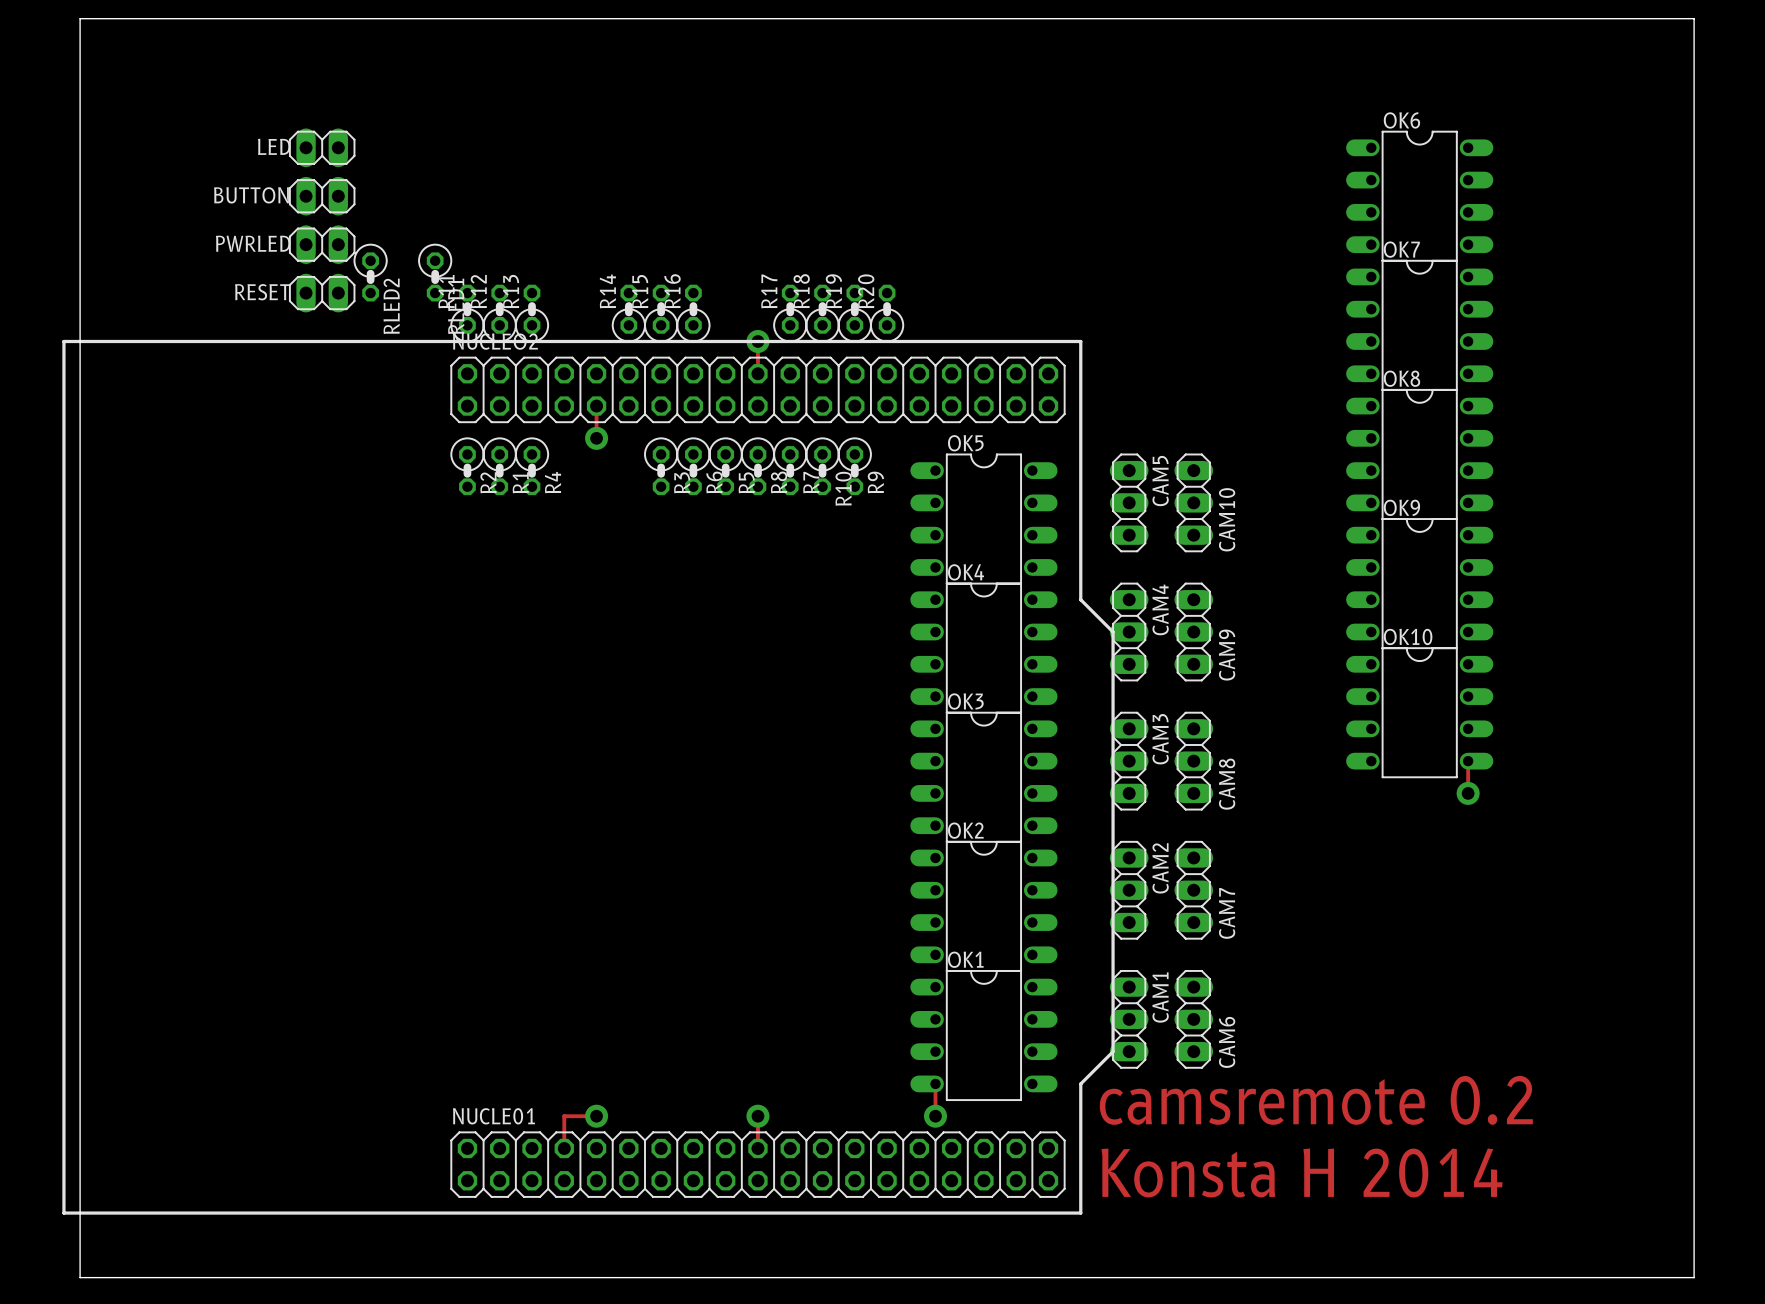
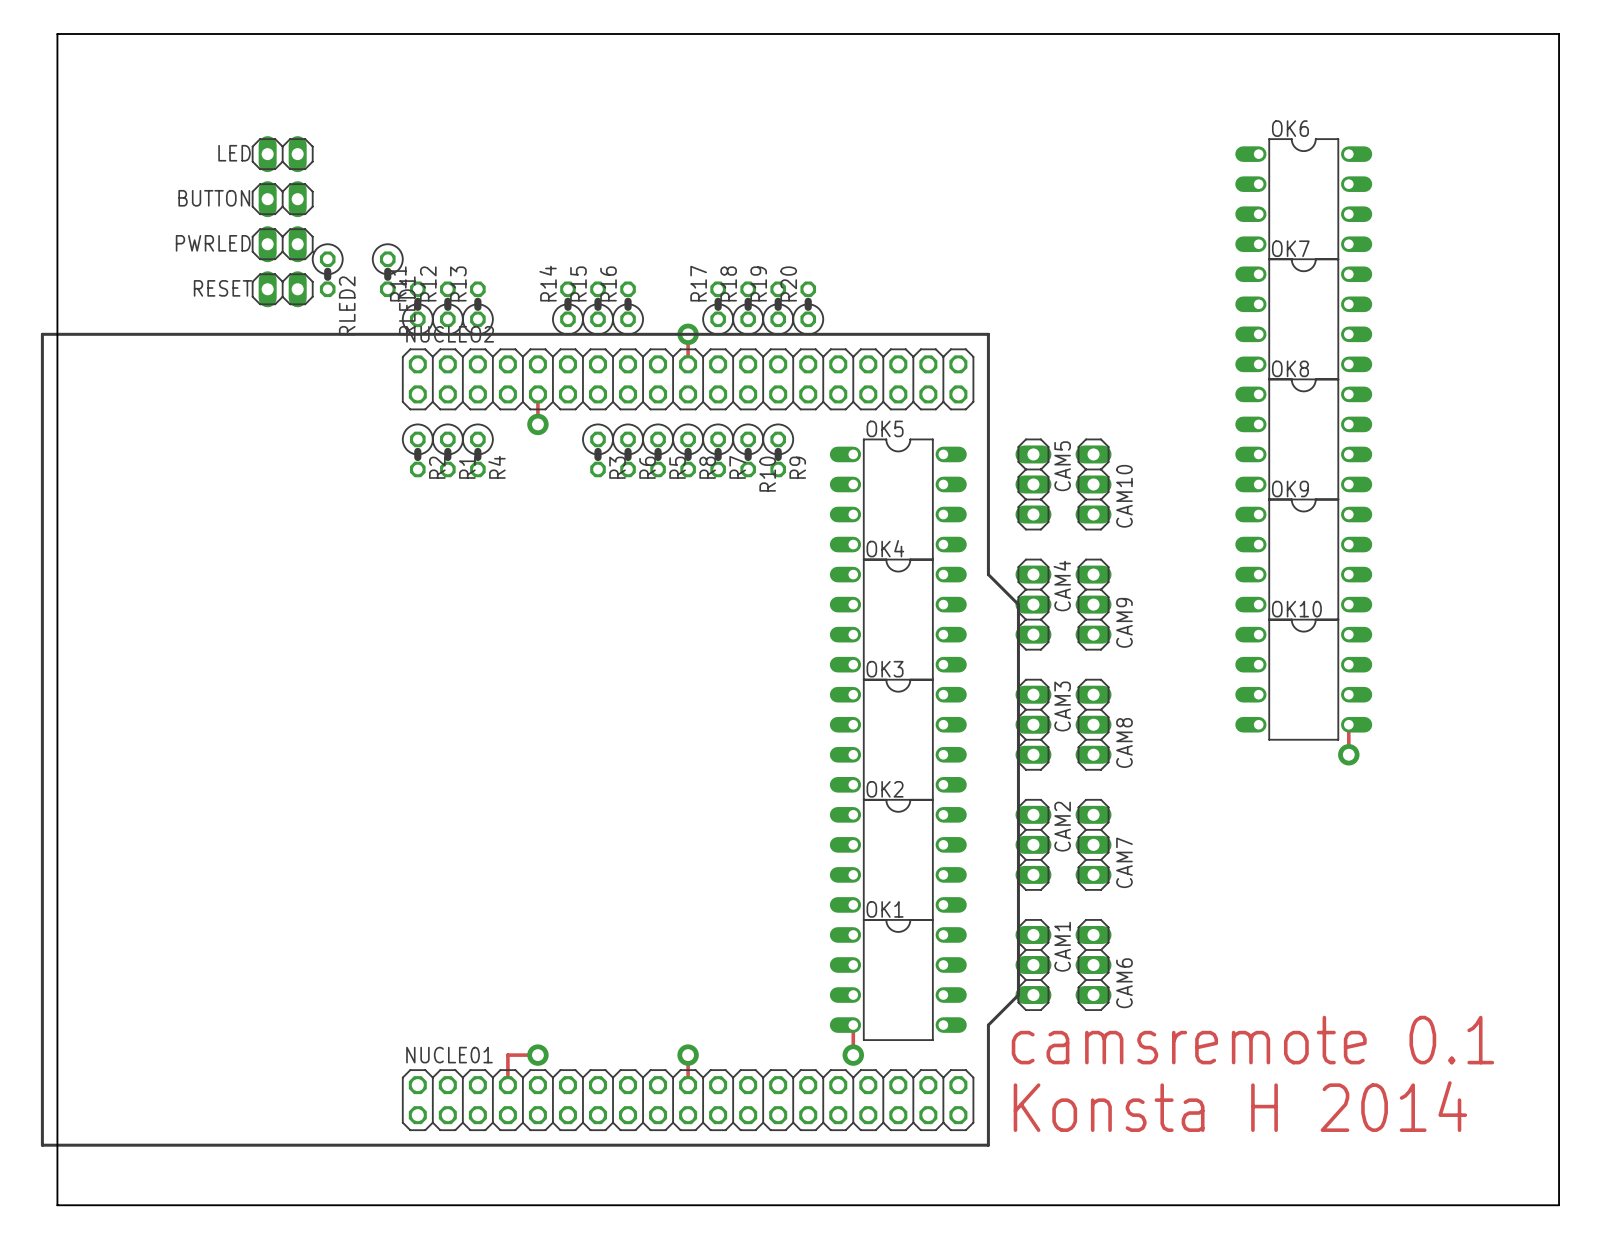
text: camsremote 0.2 (1316, 1100) -> camsremote 0.1 (1252, 1040)

